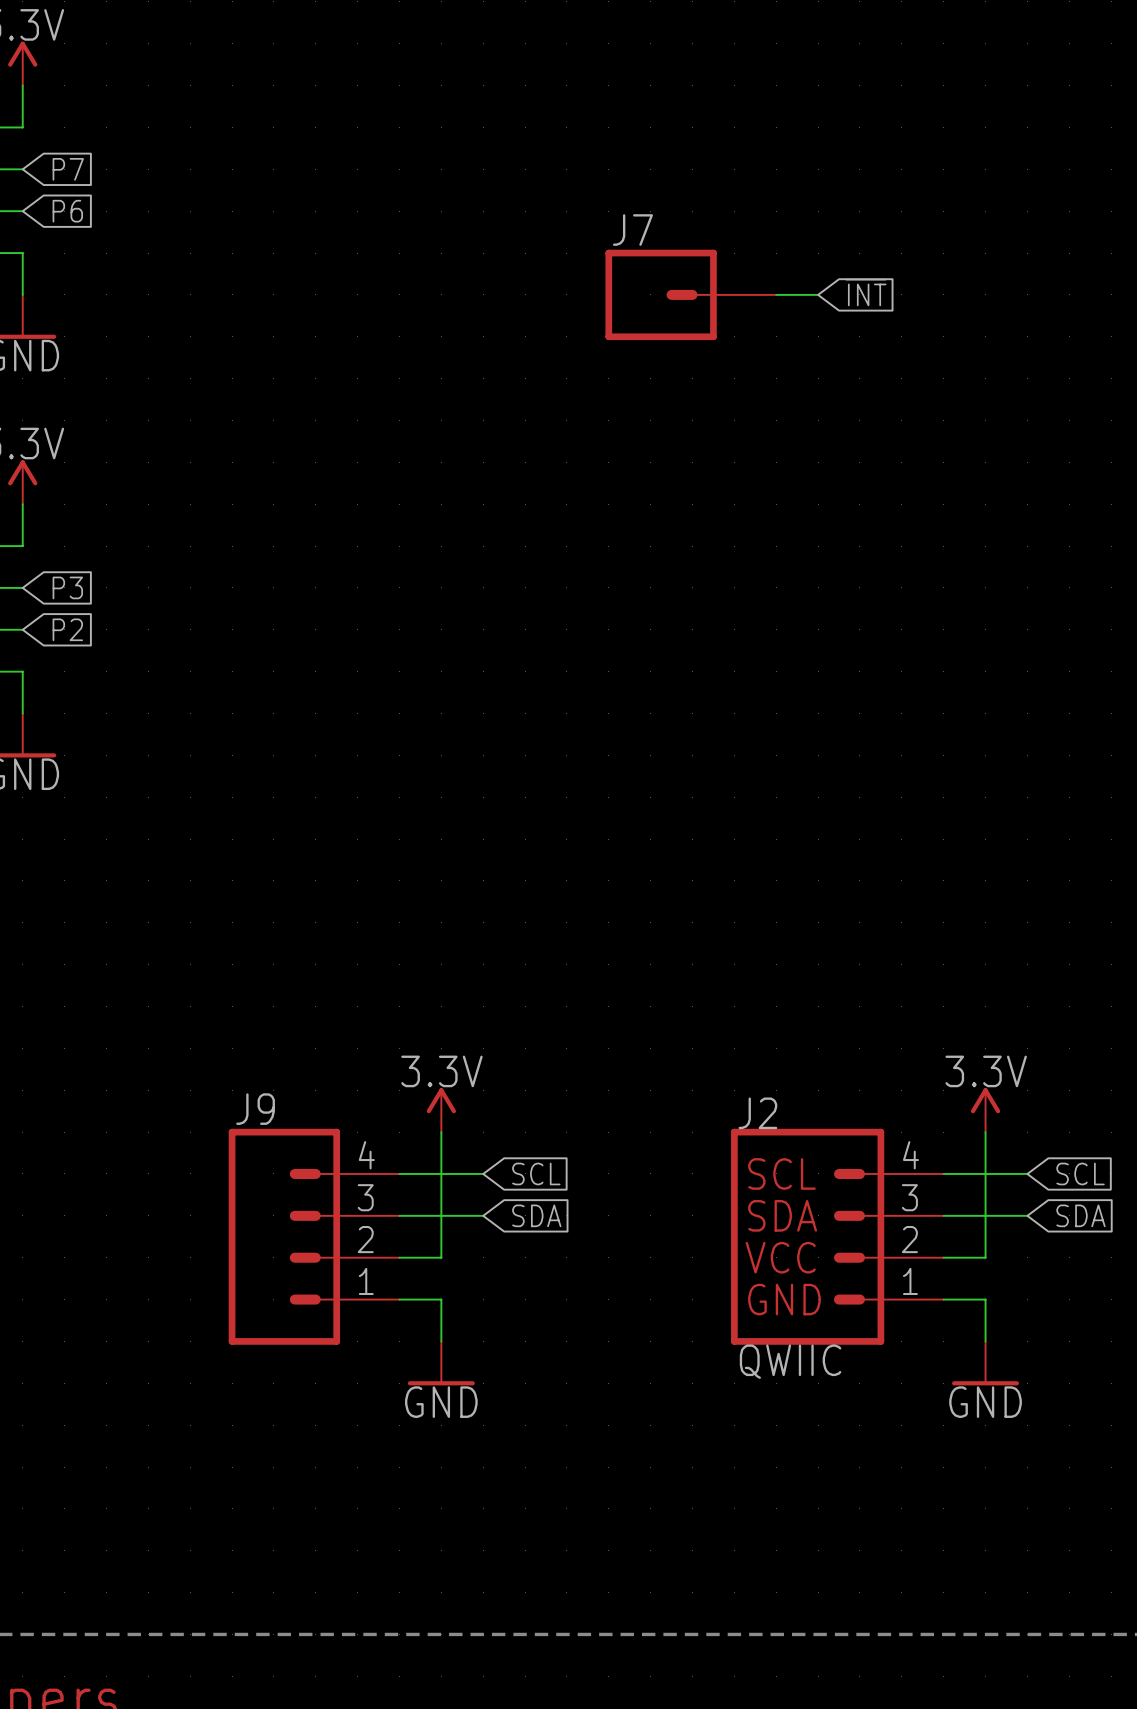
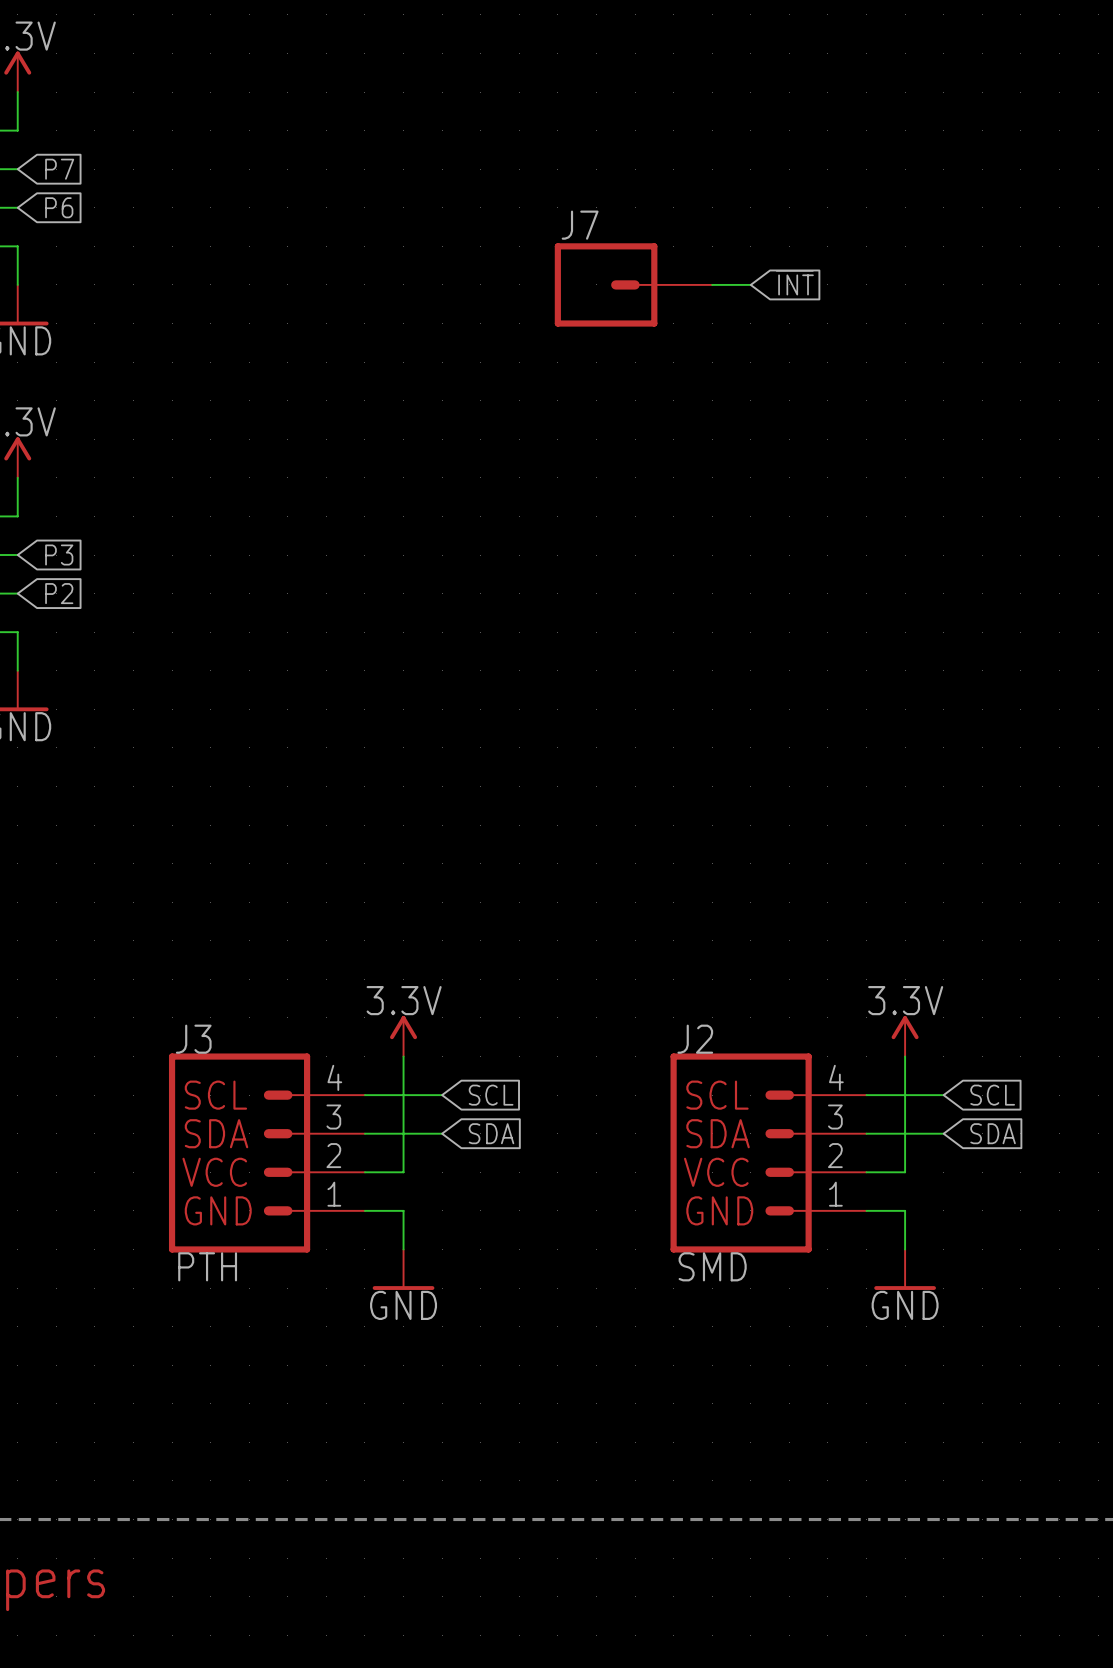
J3: none -> PTH (266, 1153)
J9: (314, 1236) -> none
J2 value: QWIIC (790, 1361) -> SMD (712, 1266)

